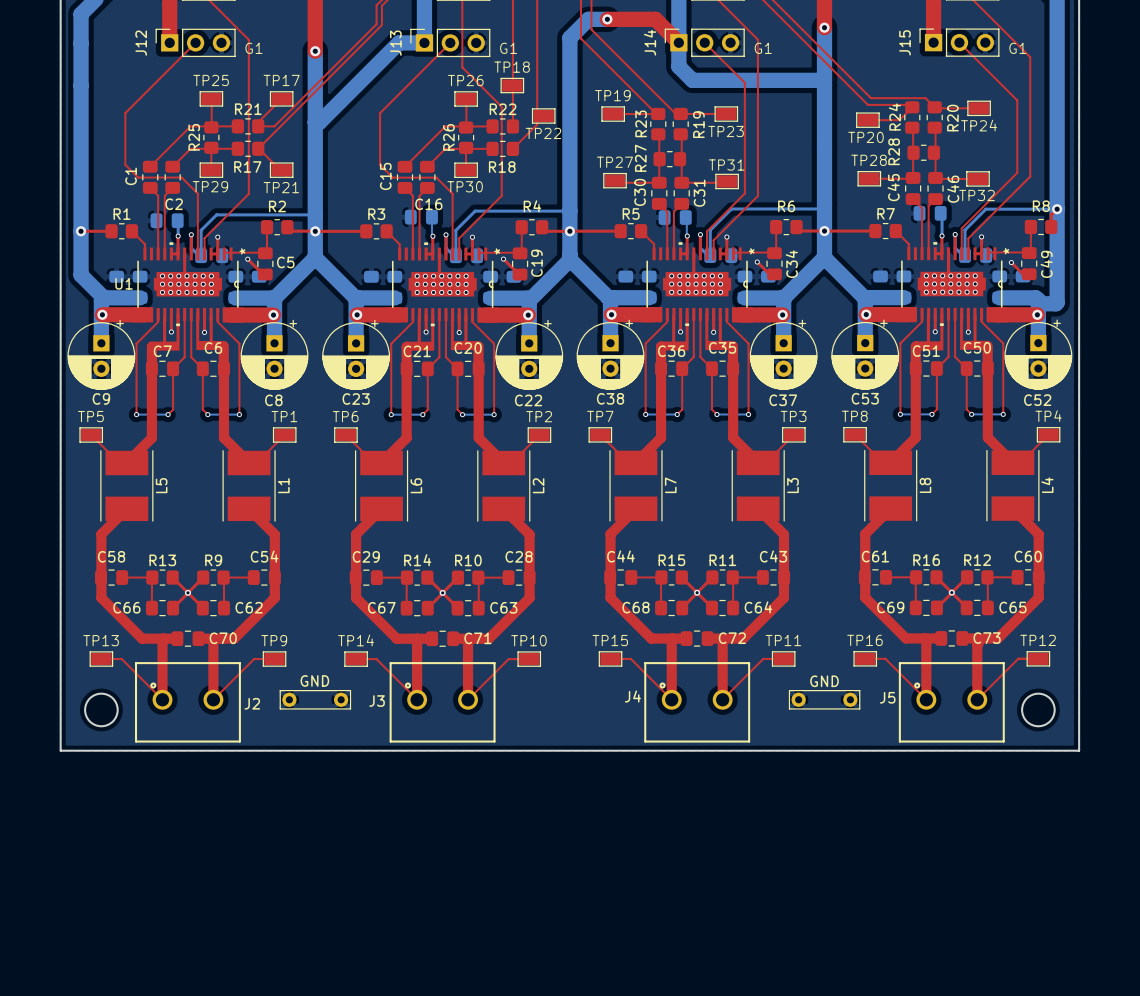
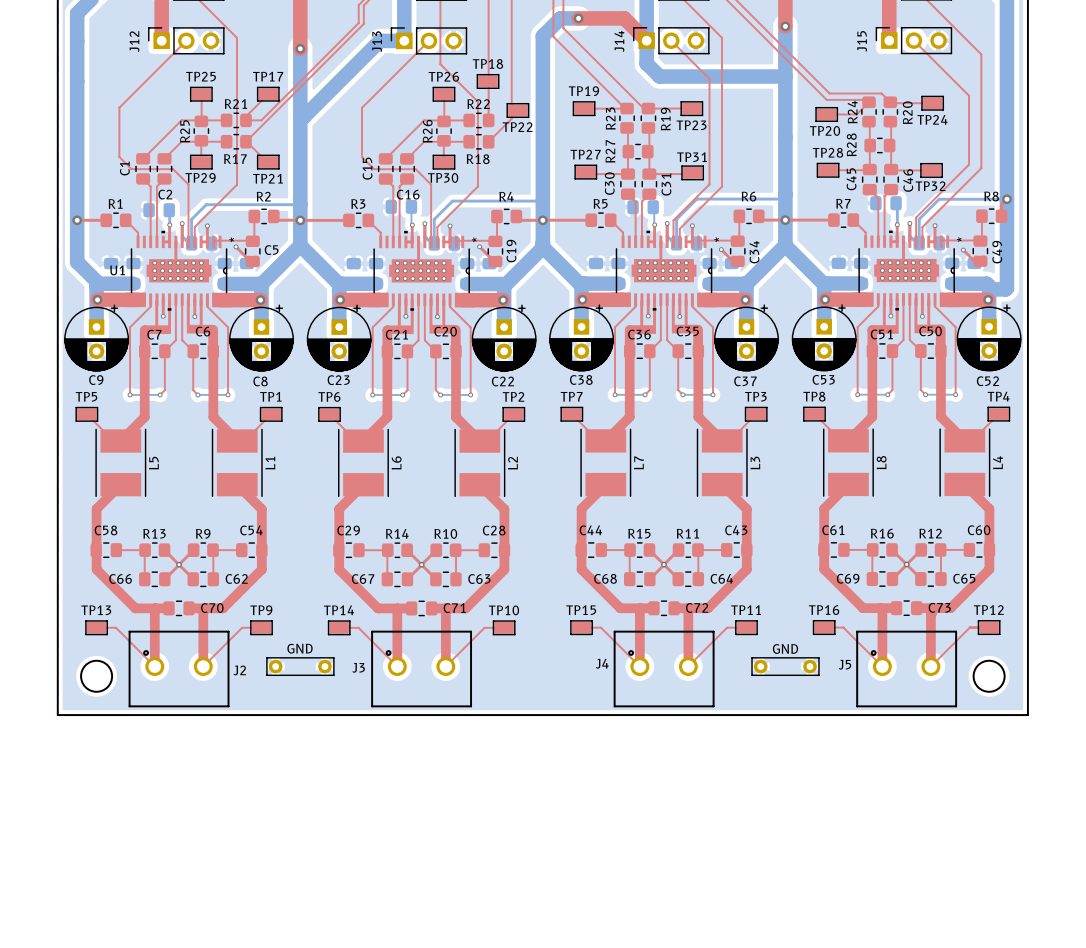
text: G1 (253, 48) -> none
text: G1 (508, 48) -> none
text: G1 (763, 48) -> none
text: G1 (1017, 48) -> none

